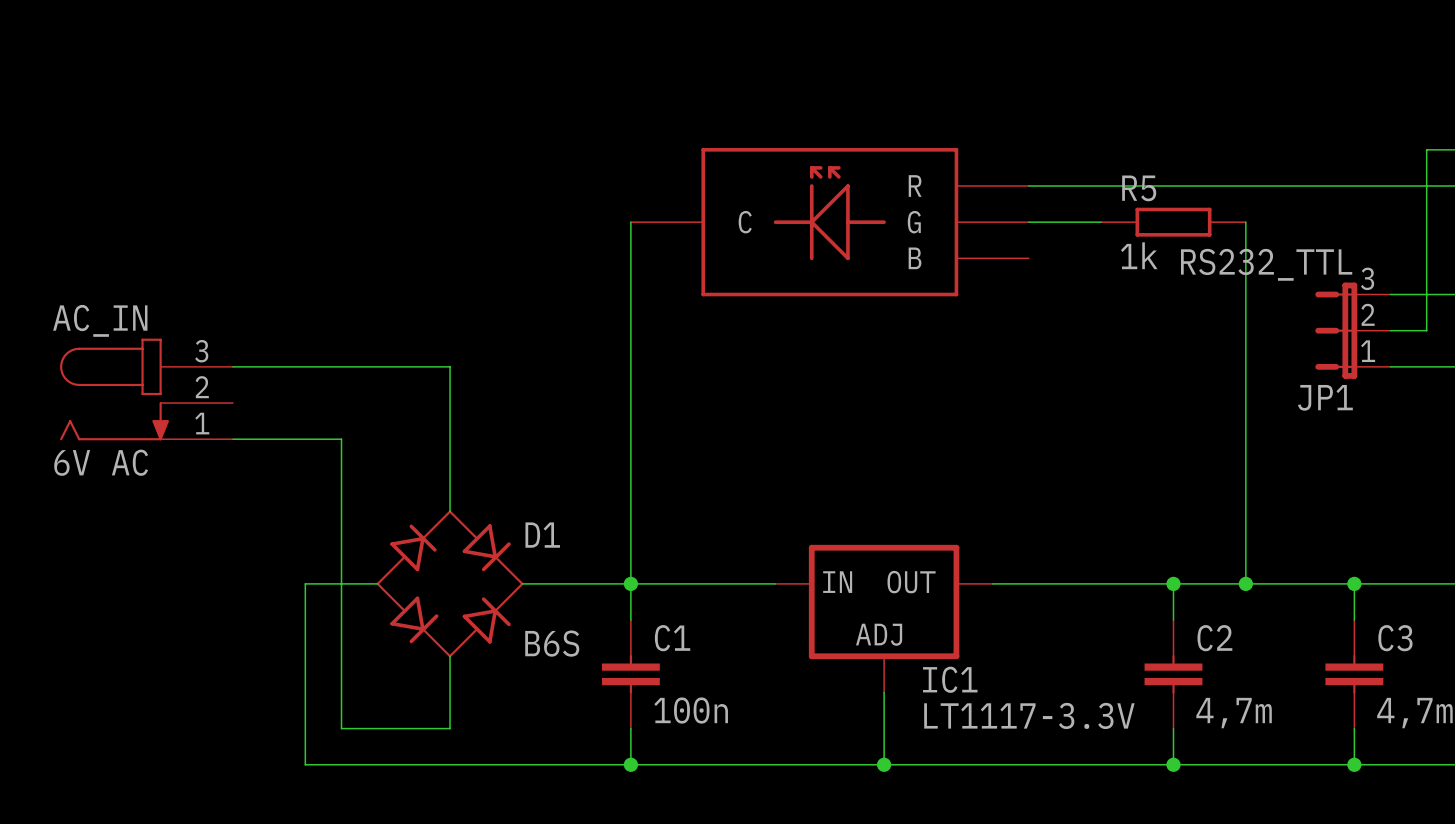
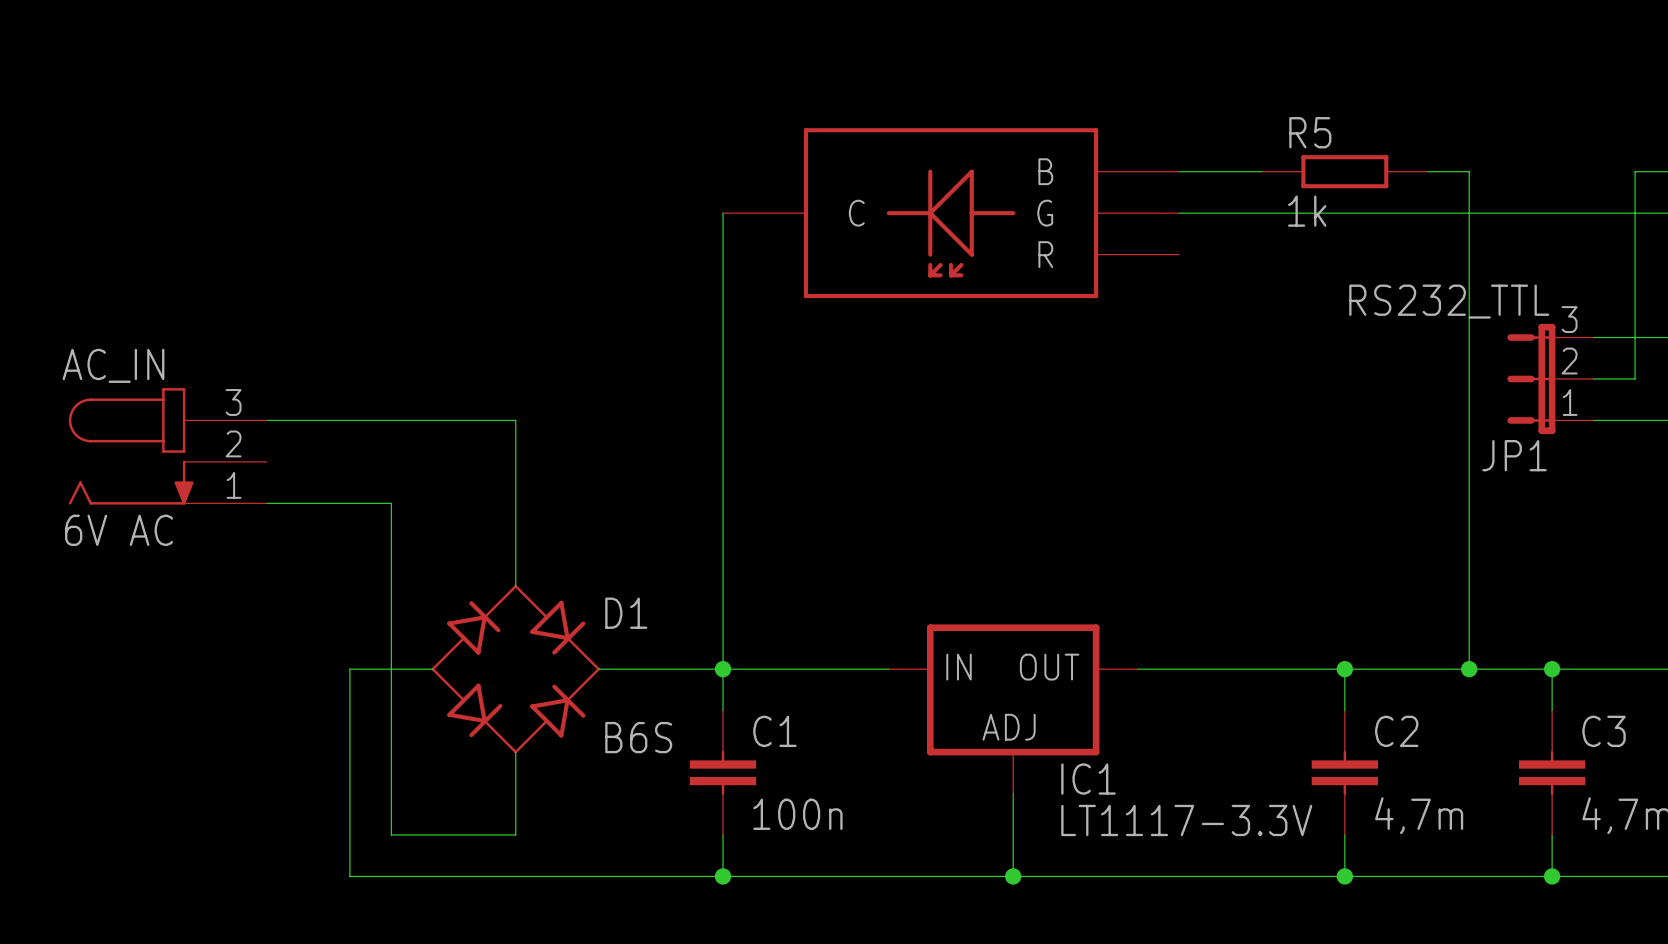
wire: none -> (1427, 171) (1469, 171) (1469, 669)
wire: none -> (723, 213) (723, 254)
part: none -> (951, 213)
part: (829, 222) -> none
wire: (1028, 222) (1101, 222) -> (1179, 171) (1261, 171)
R5 position: (1173, 222) -> (1344, 171)
wire: (1245, 222) (1245, 583) -> none
junction position: (1245, 583) -> (1469, 669)

